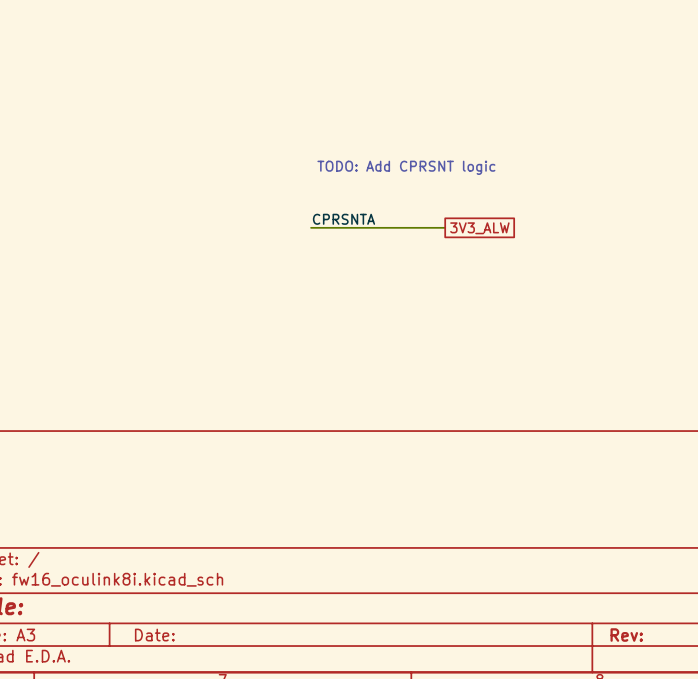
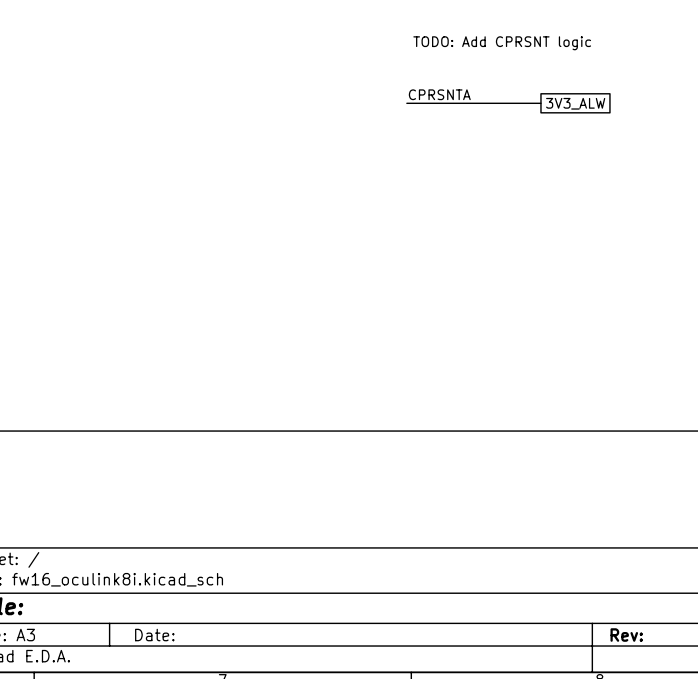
text position: TODO: Add CPRSNT logic (406, 167) -> TODO: Add CPRSNT logic (502, 43)
label position: CPRSNTA (343, 219) -> CPRSNTA (439, 94)
wire: (311, 227) (445, 227) -> (406, 103) (540, 103)
global label position: 3V3_ALW (479, 228) -> 3V3_ALW (575, 103)

